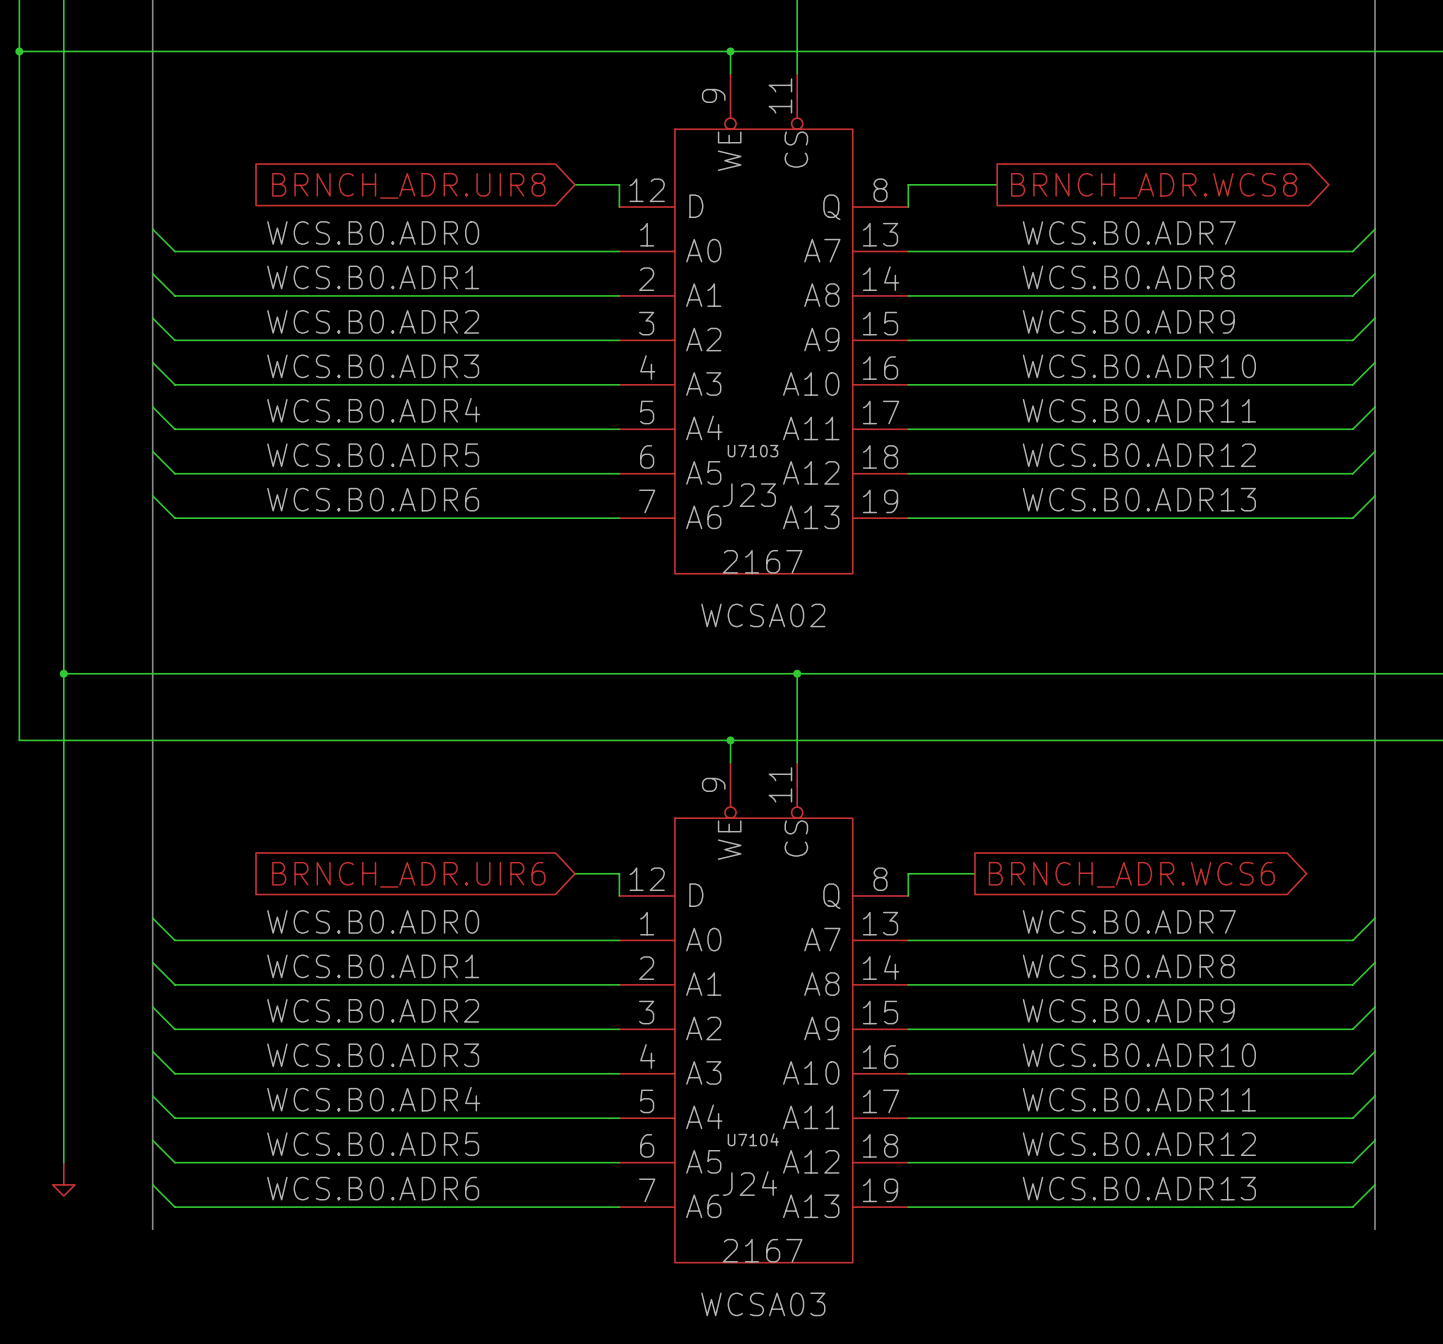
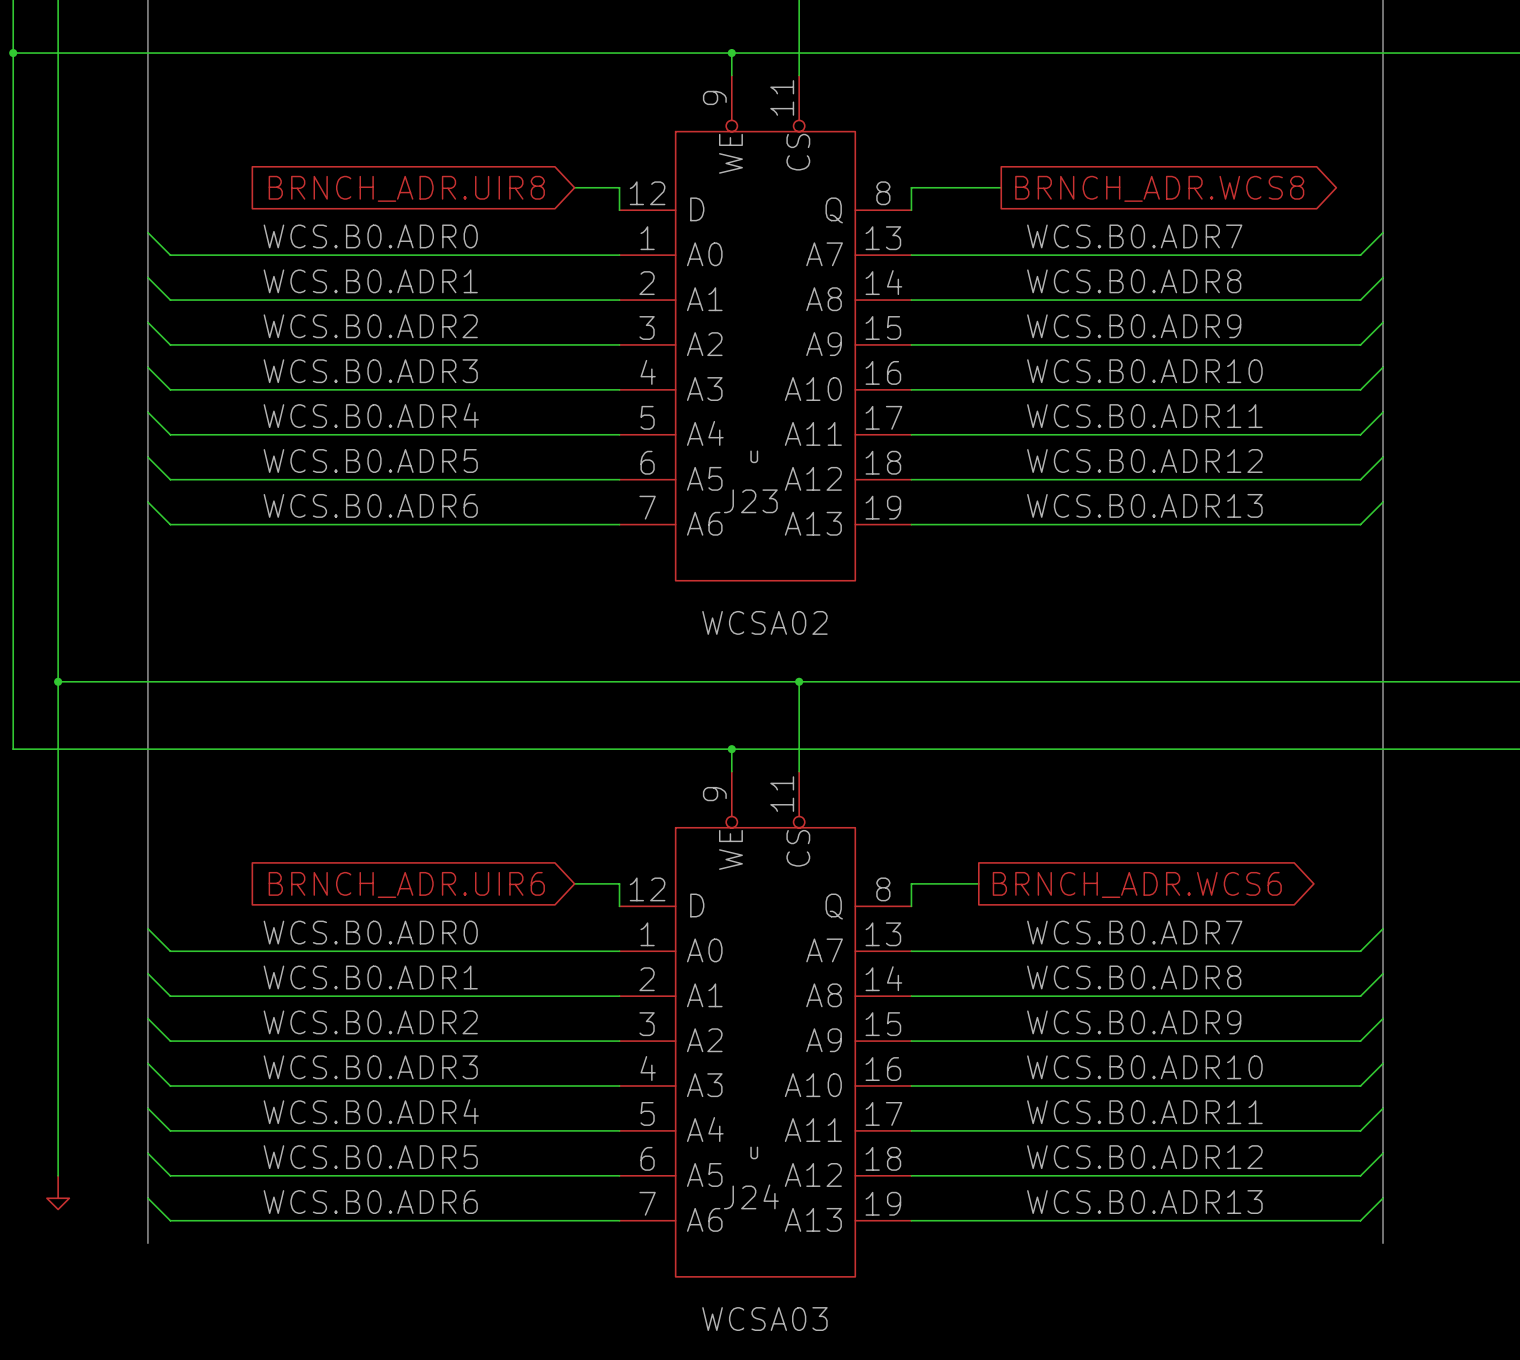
U7103 name: U7103 (752, 451) -> U (754, 456)
U7103 value: 2167 (762, 561) -> none
U7104 name: U7104 (753, 1139) -> U (754, 1152)
U7104 value: 2167 (762, 1250) -> none

